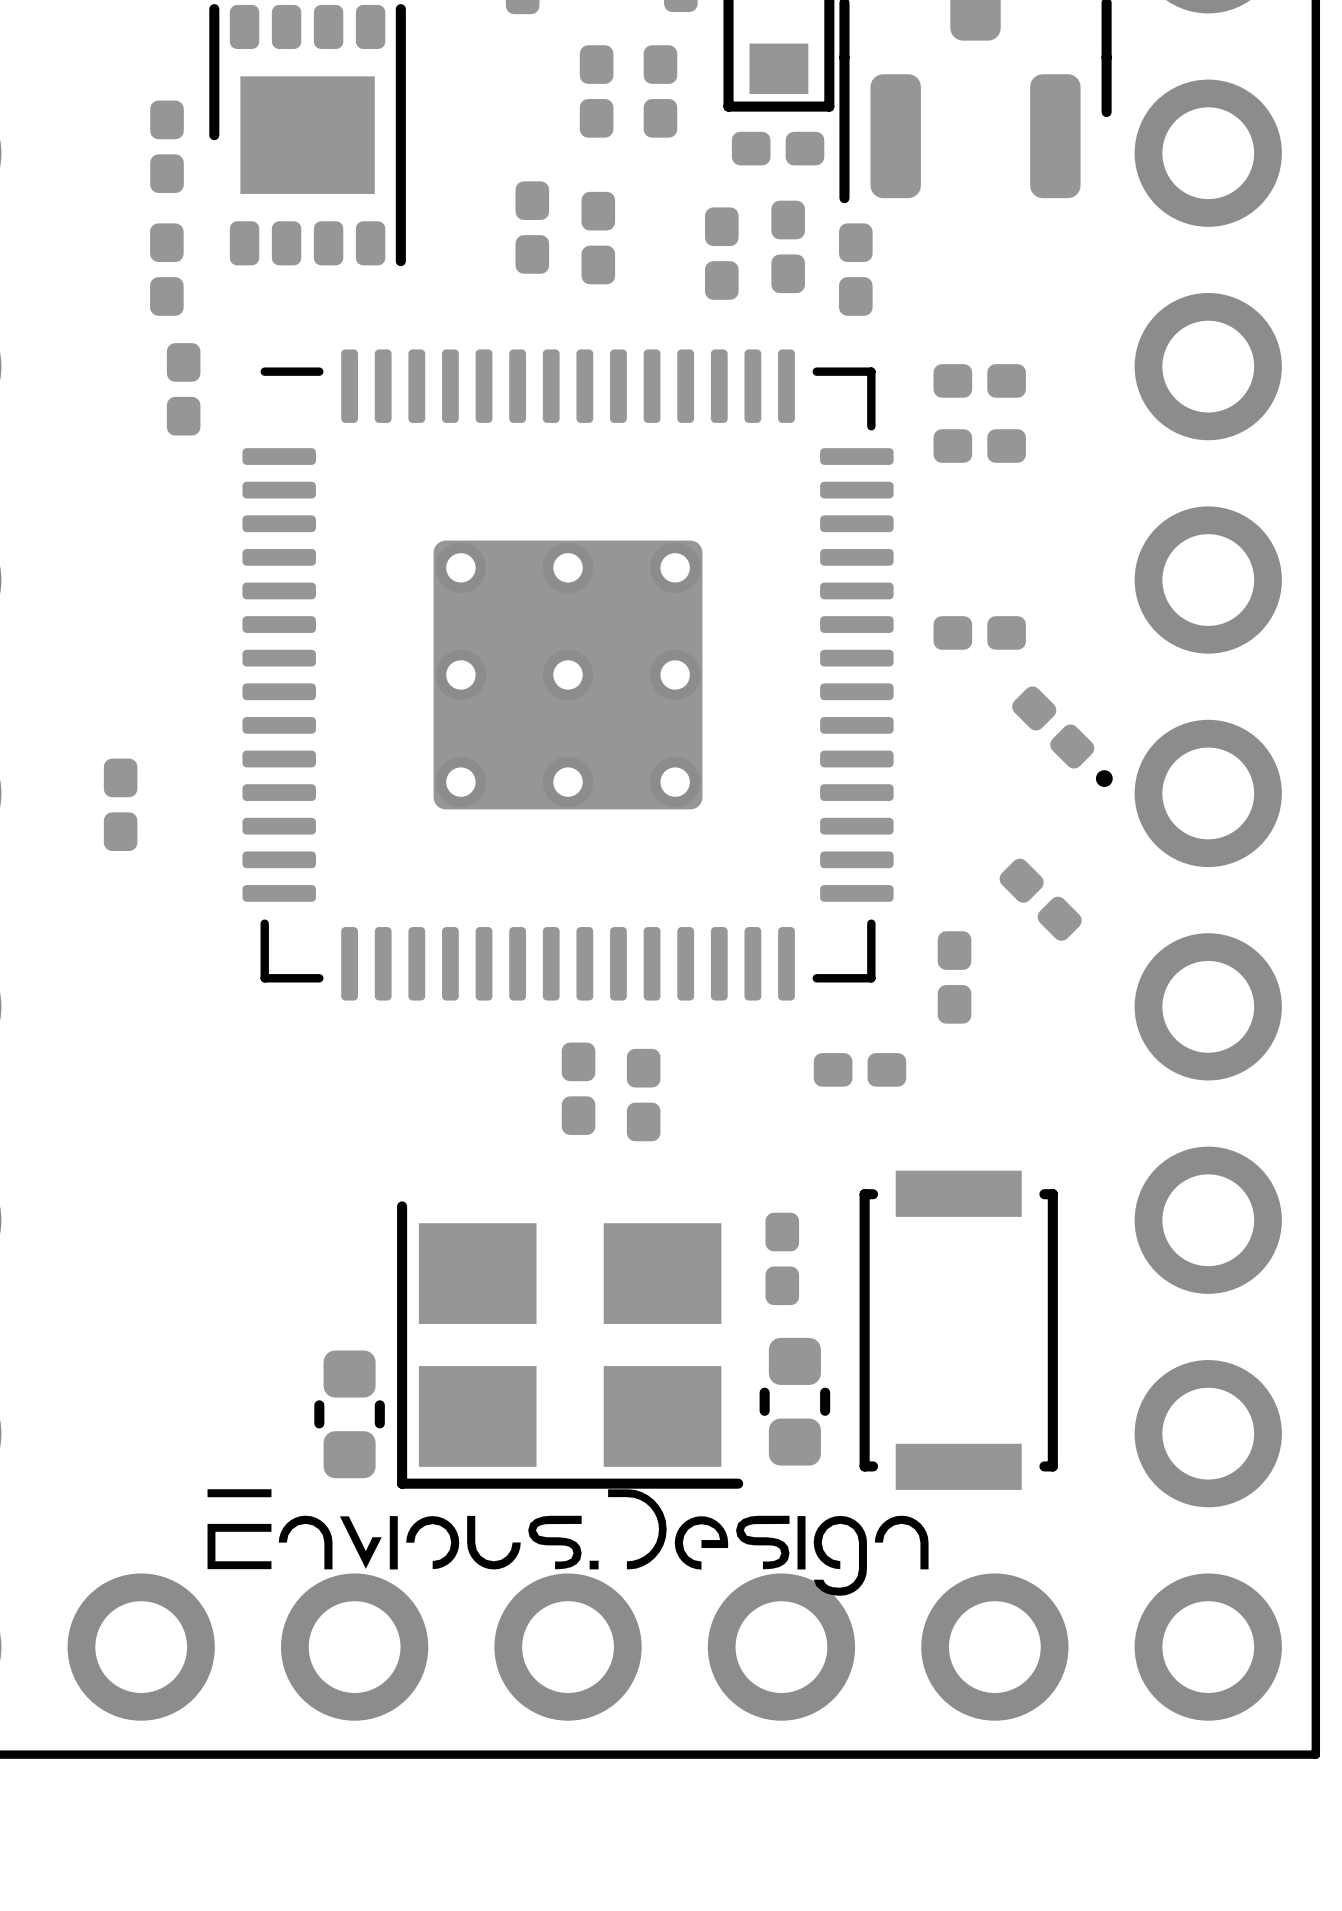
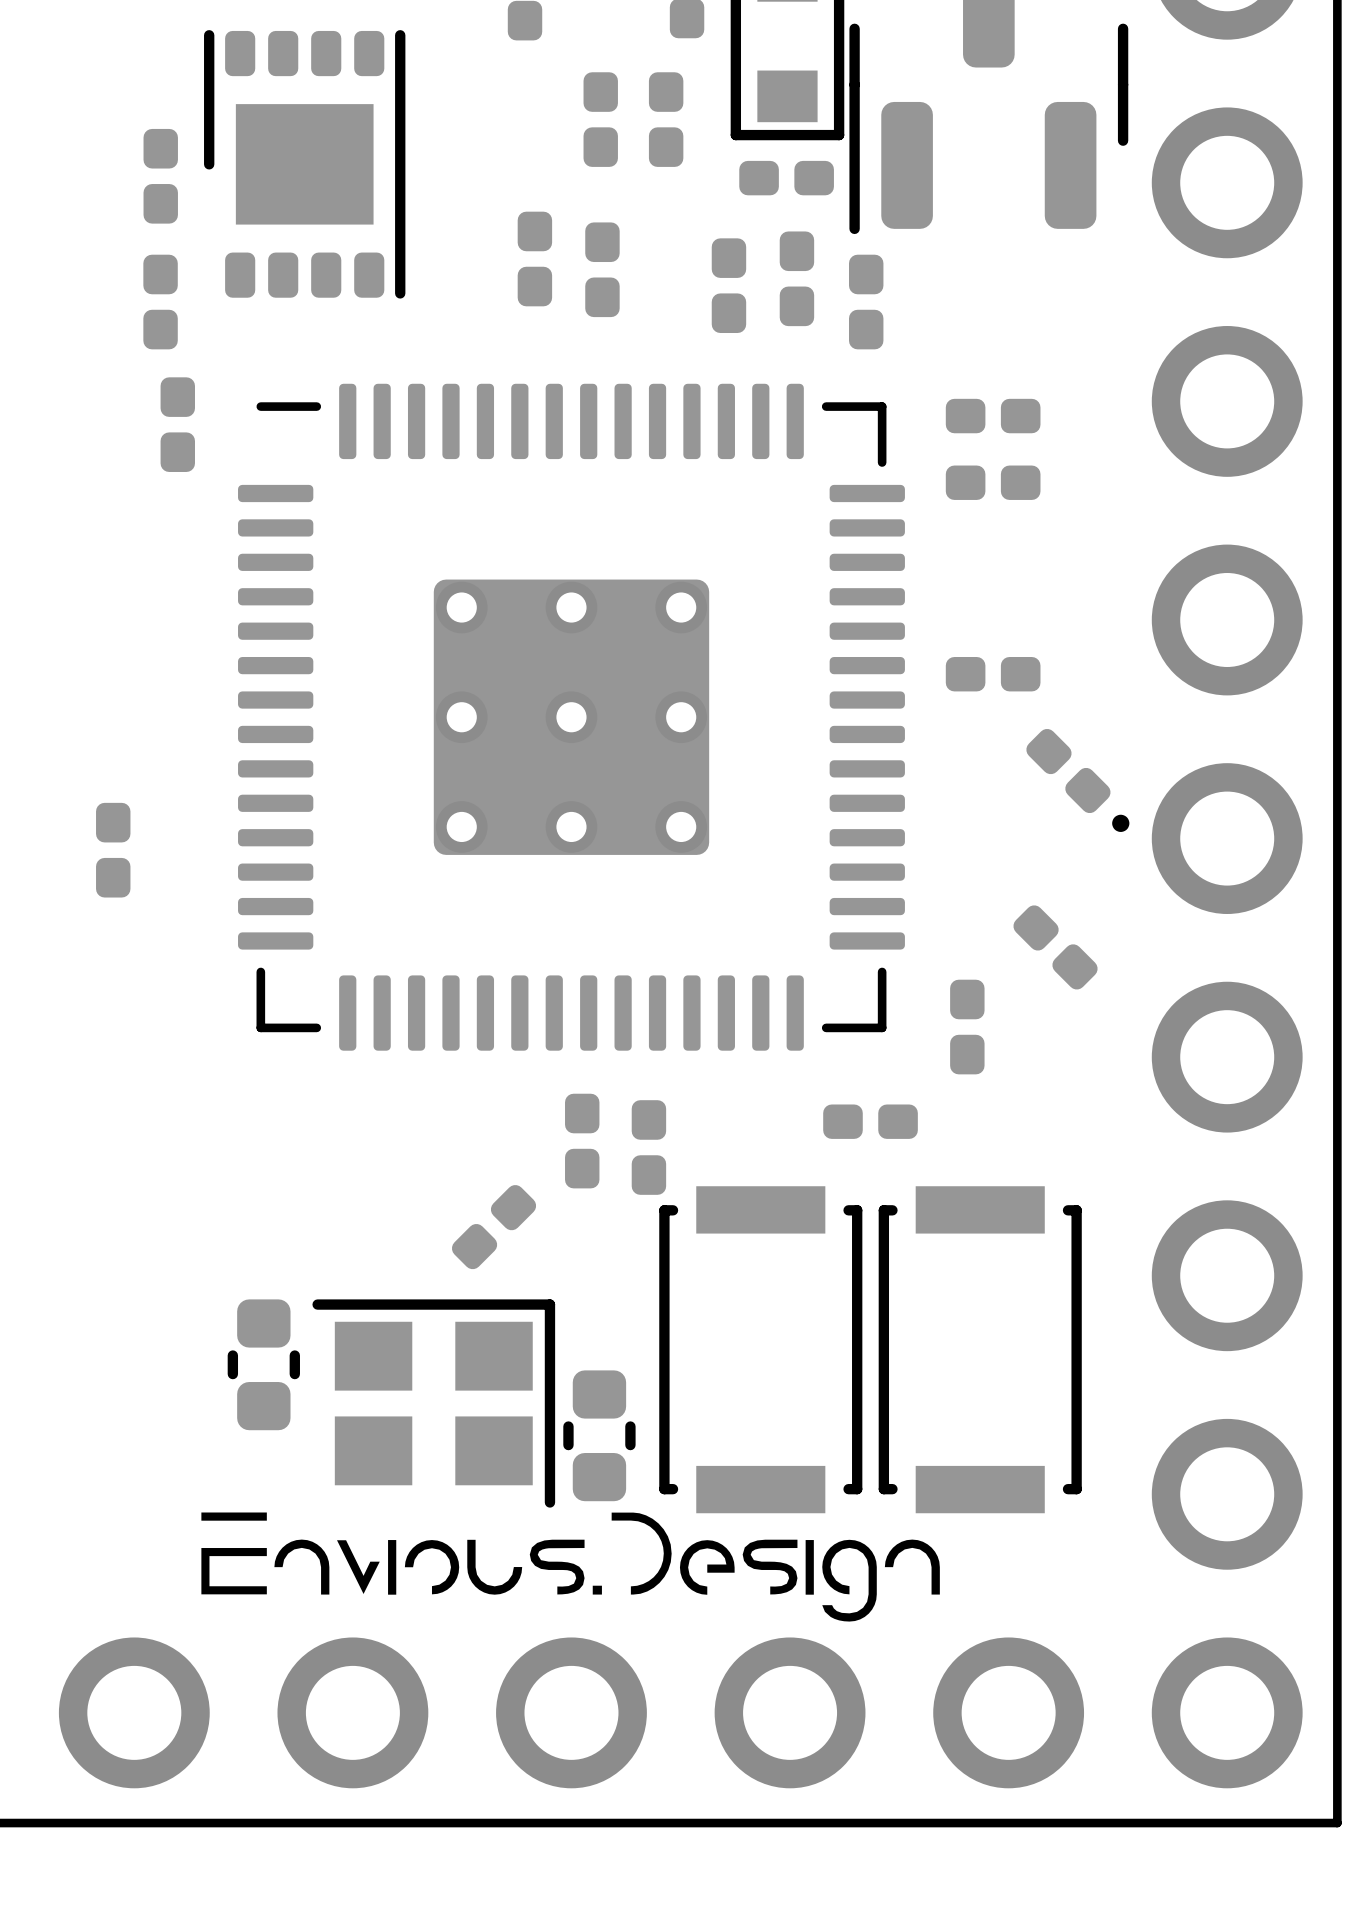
part: none -> (494, 1227)
part footprint: [397, 1201, 744, 1489] -> [563, 1370, 636, 1502]
part footprint: [765, 1212, 800, 1306] -> [659, 1186, 863, 1514]
part position: (958, 1330) -> (980, 1349)
part: none -> (433, 1403)
part: (794, 1401) -> none
part position: (349, 1414) -> (263, 1364)
drawing position: (568, 1542) -> (570, 1567)

